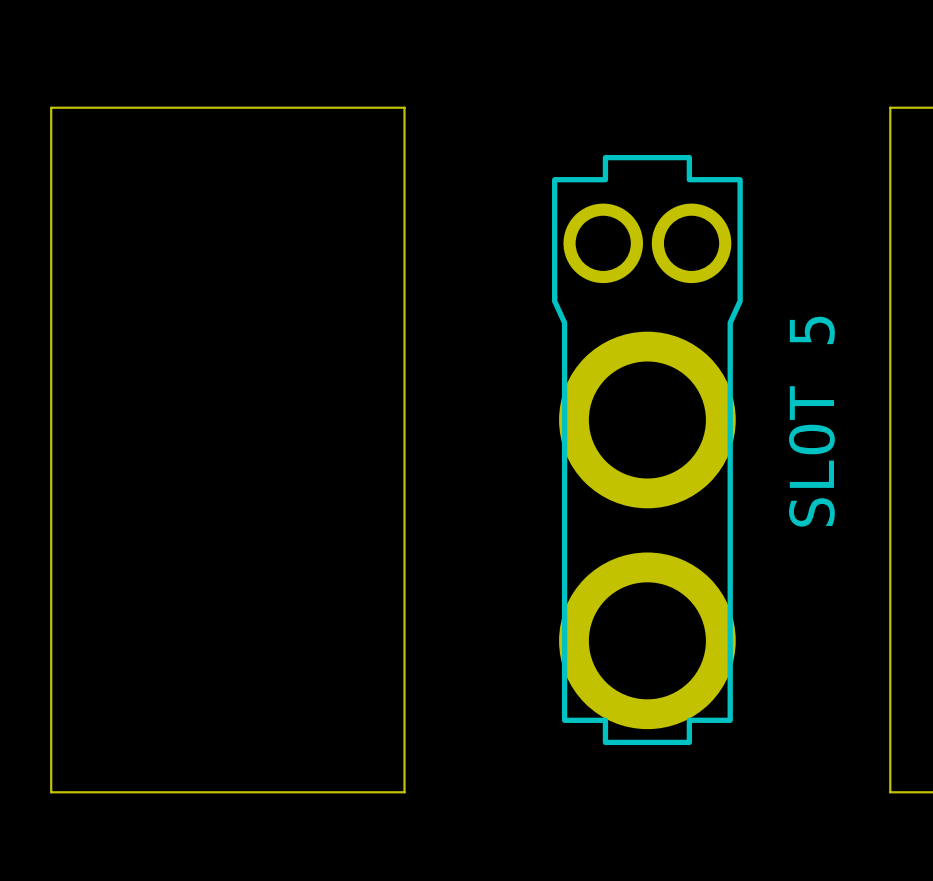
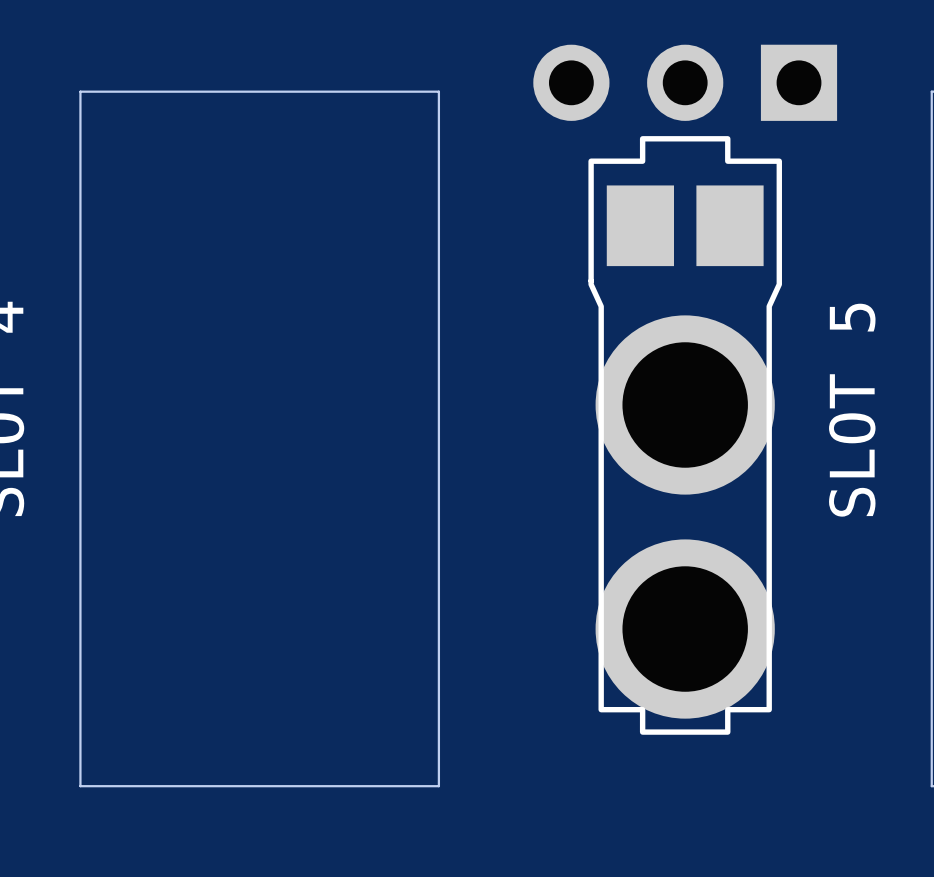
part: none -> (685, 82)
part footprint: [552, 154, 743, 746] -> [588, 136, 782, 735]

